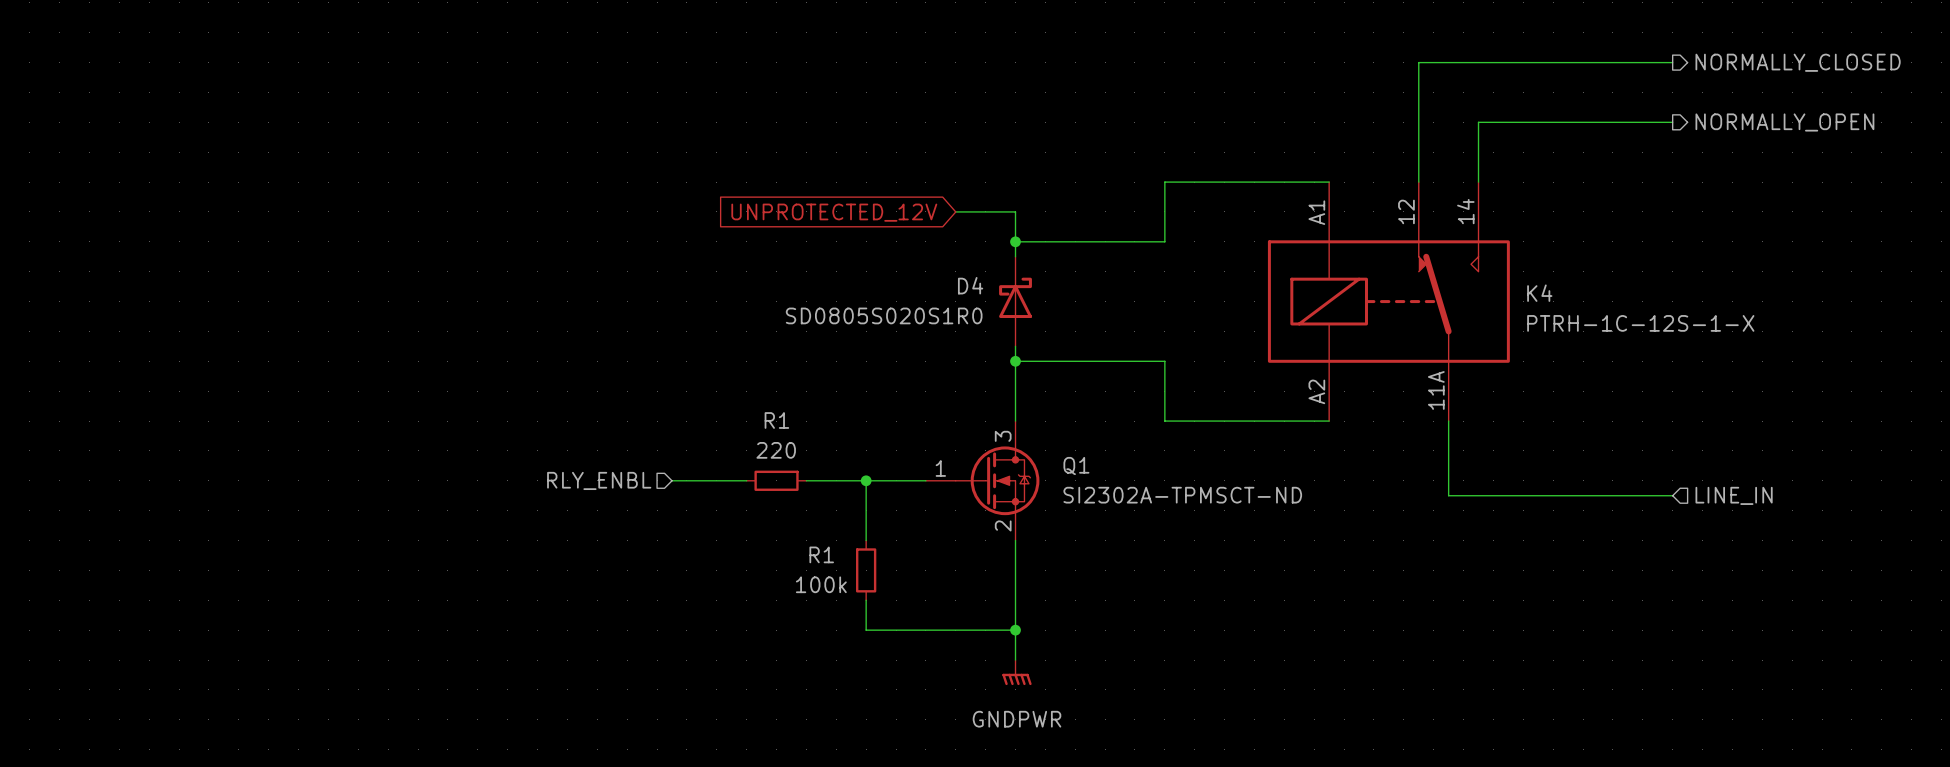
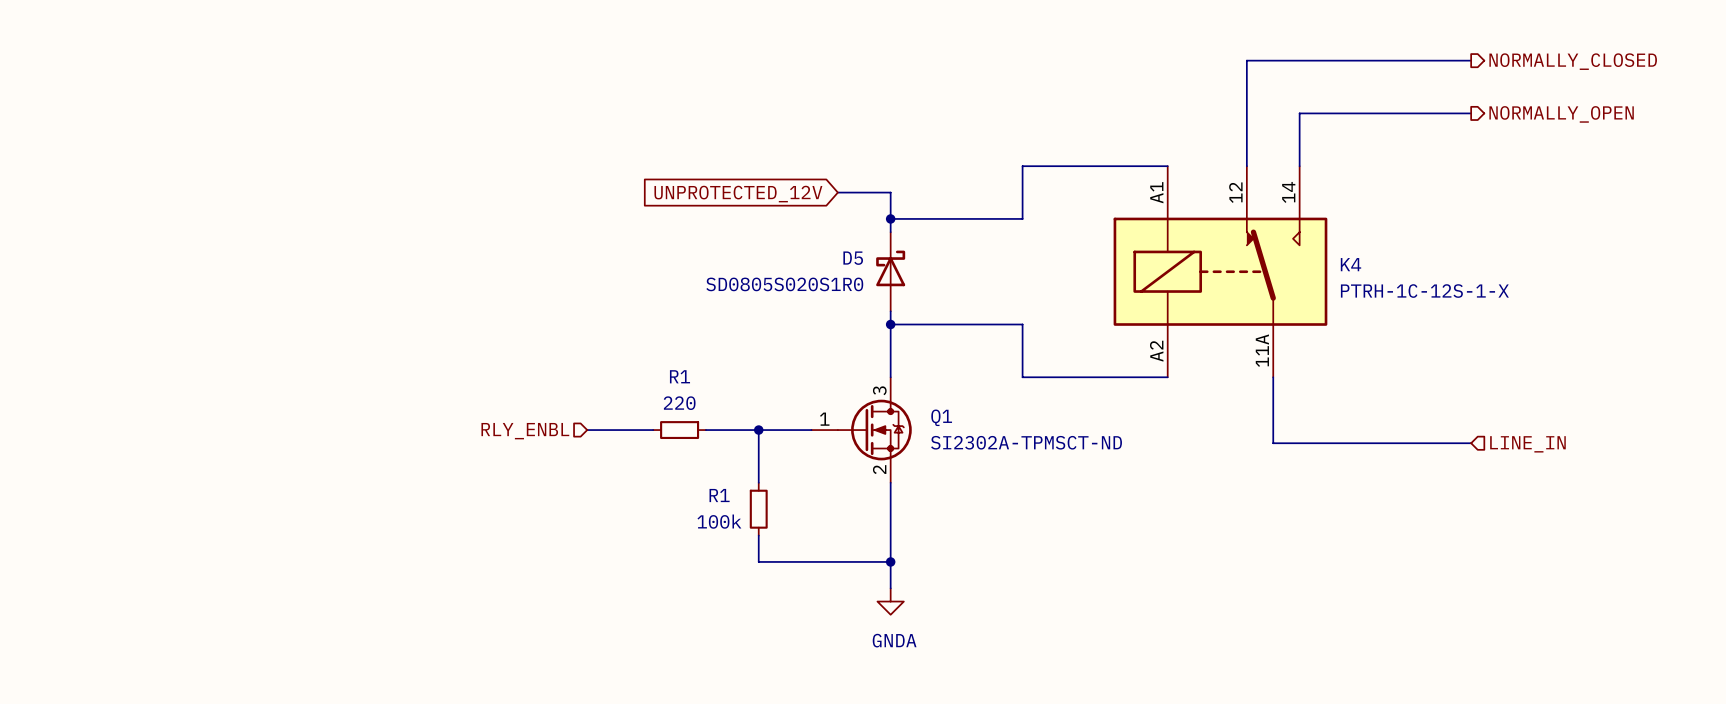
D4 name: D4 (970, 285) -> D5 (853, 258)
power symbol: GNDPWR (1017, 672) -> GNDA (890, 601)

